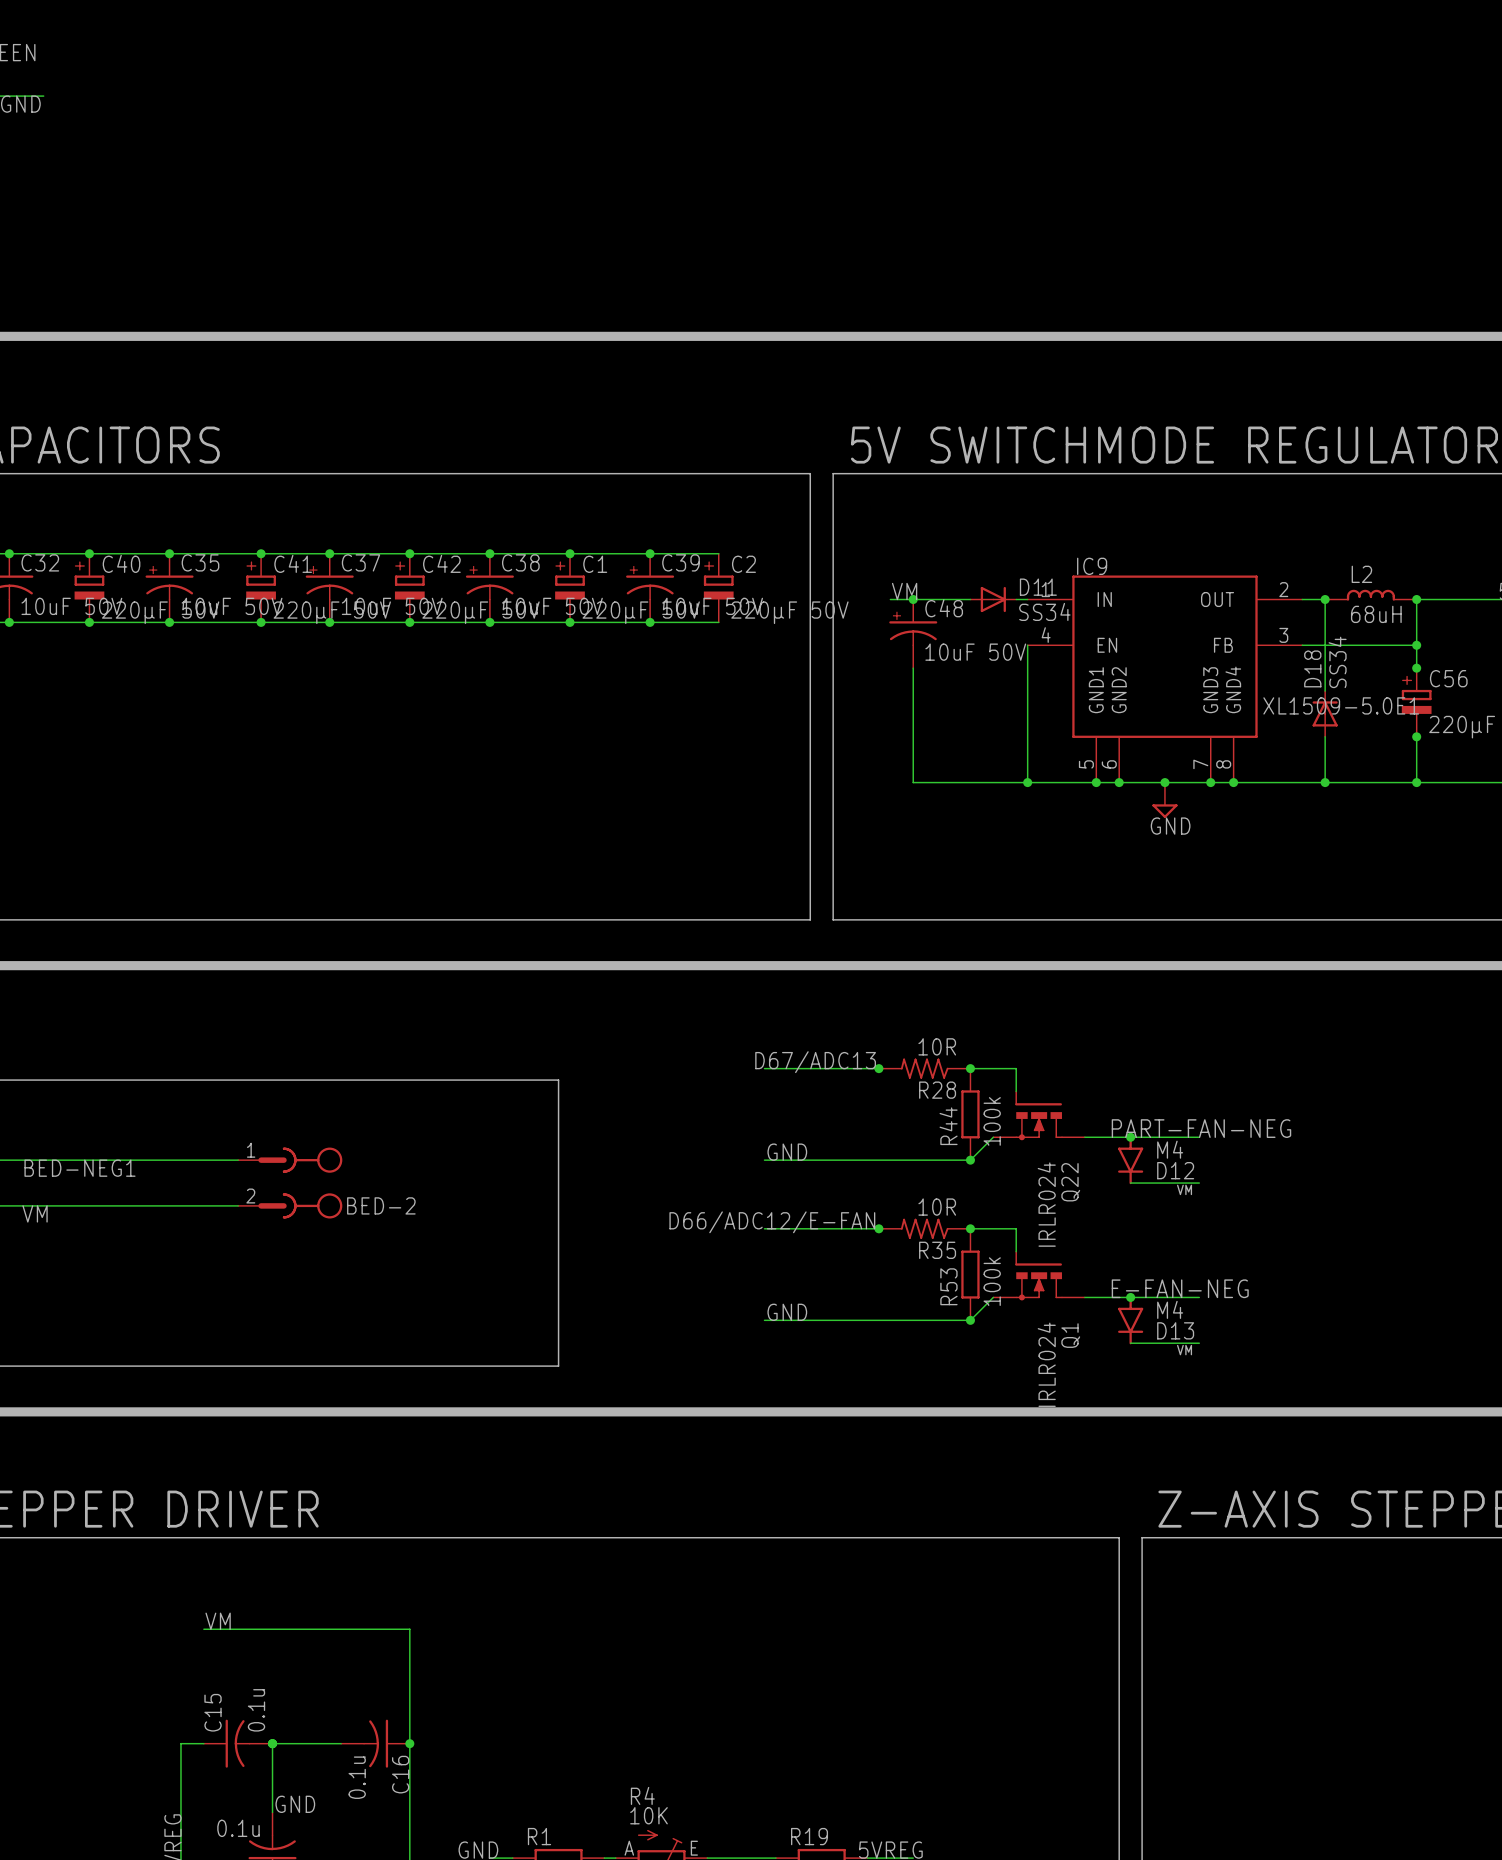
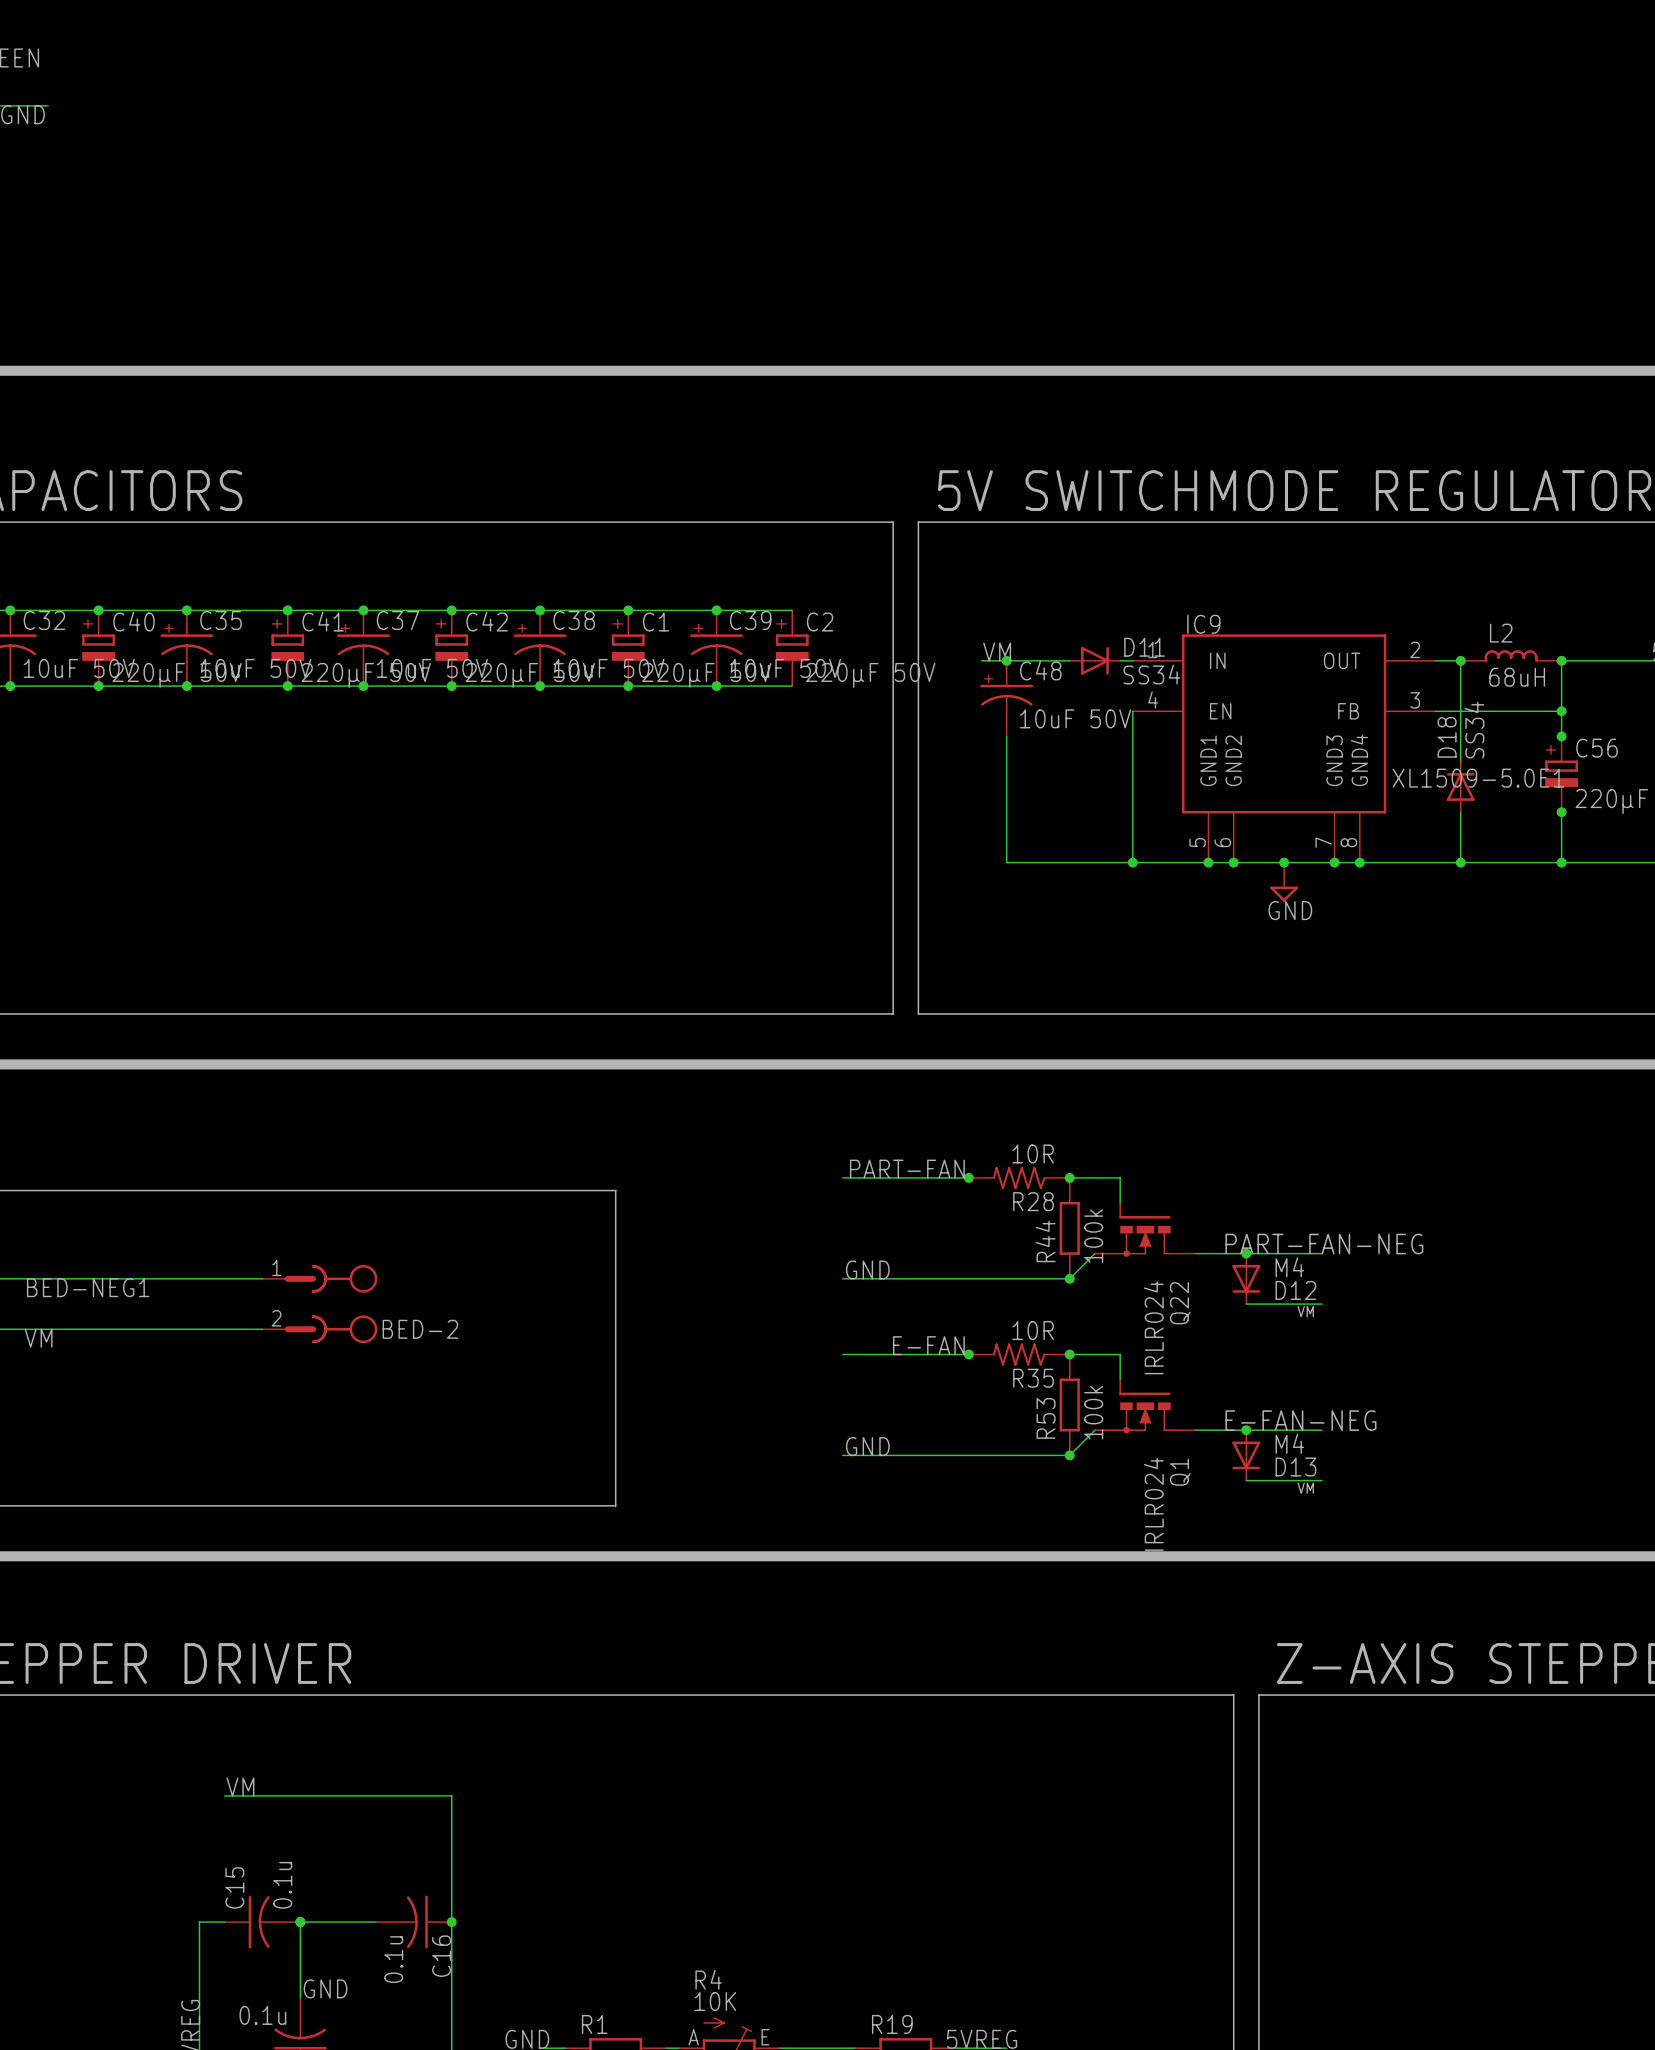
label: D67/ADC13 (815, 1062) -> PART-FAN (907, 1169)
D12 symbol: [1118, 1136, 1144, 1185] -> [1232, 1253, 1261, 1305]
label: D66/ADC12/E-FAN (772, 1222) -> E-FAN (928, 1345)
D13 symbol: [1118, 1296, 1144, 1345] -> [1232, 1430, 1261, 1481]

